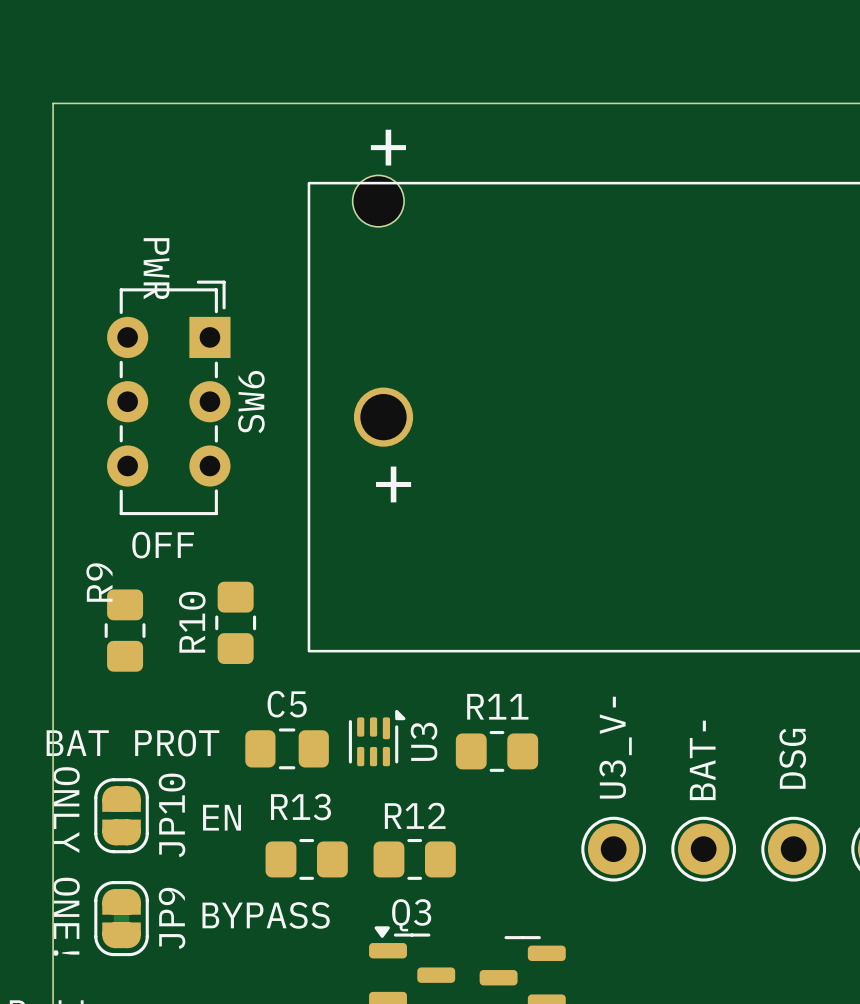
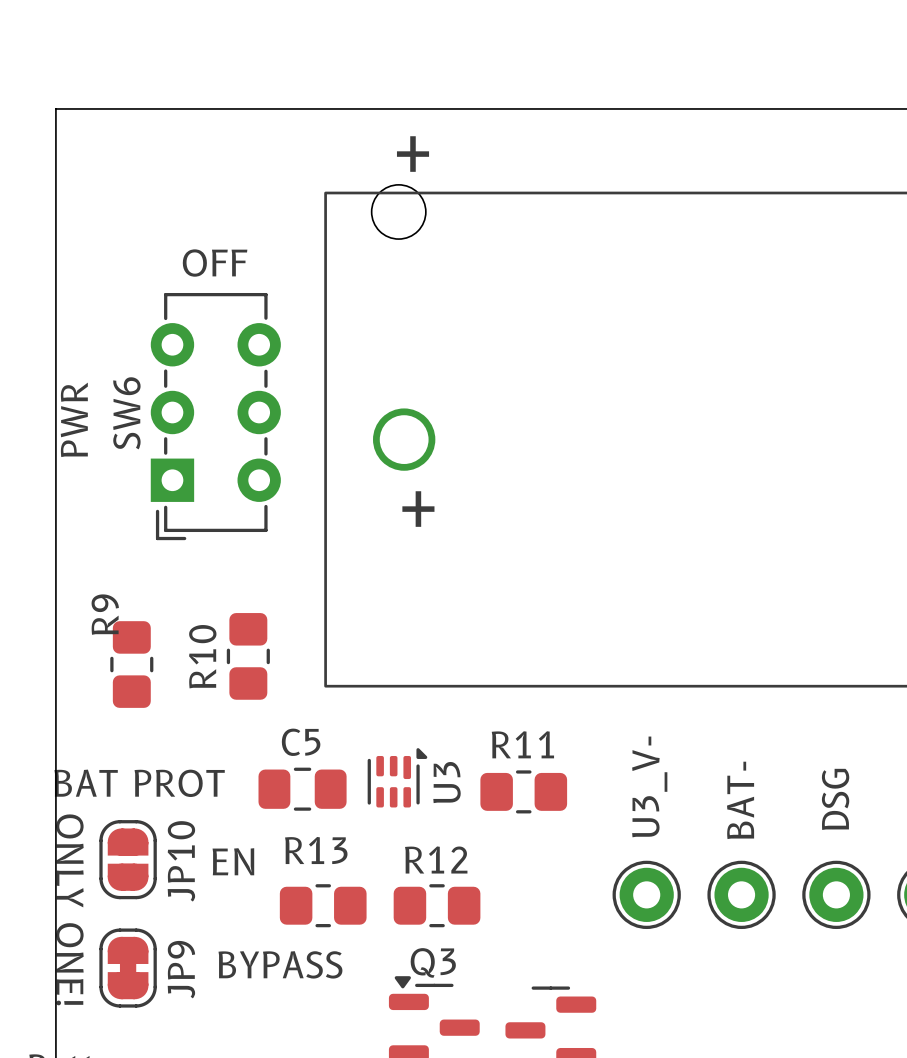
text rotation: 0° (156, 268) -> 180° (74, 419)
text position: PWR (156, 268) -> PWR (74, 419)
SW6 rotation: 0° (168, 397) -> 180° (215, 416)
text position: OFF (163, 545) -> OFF (215, 263)

